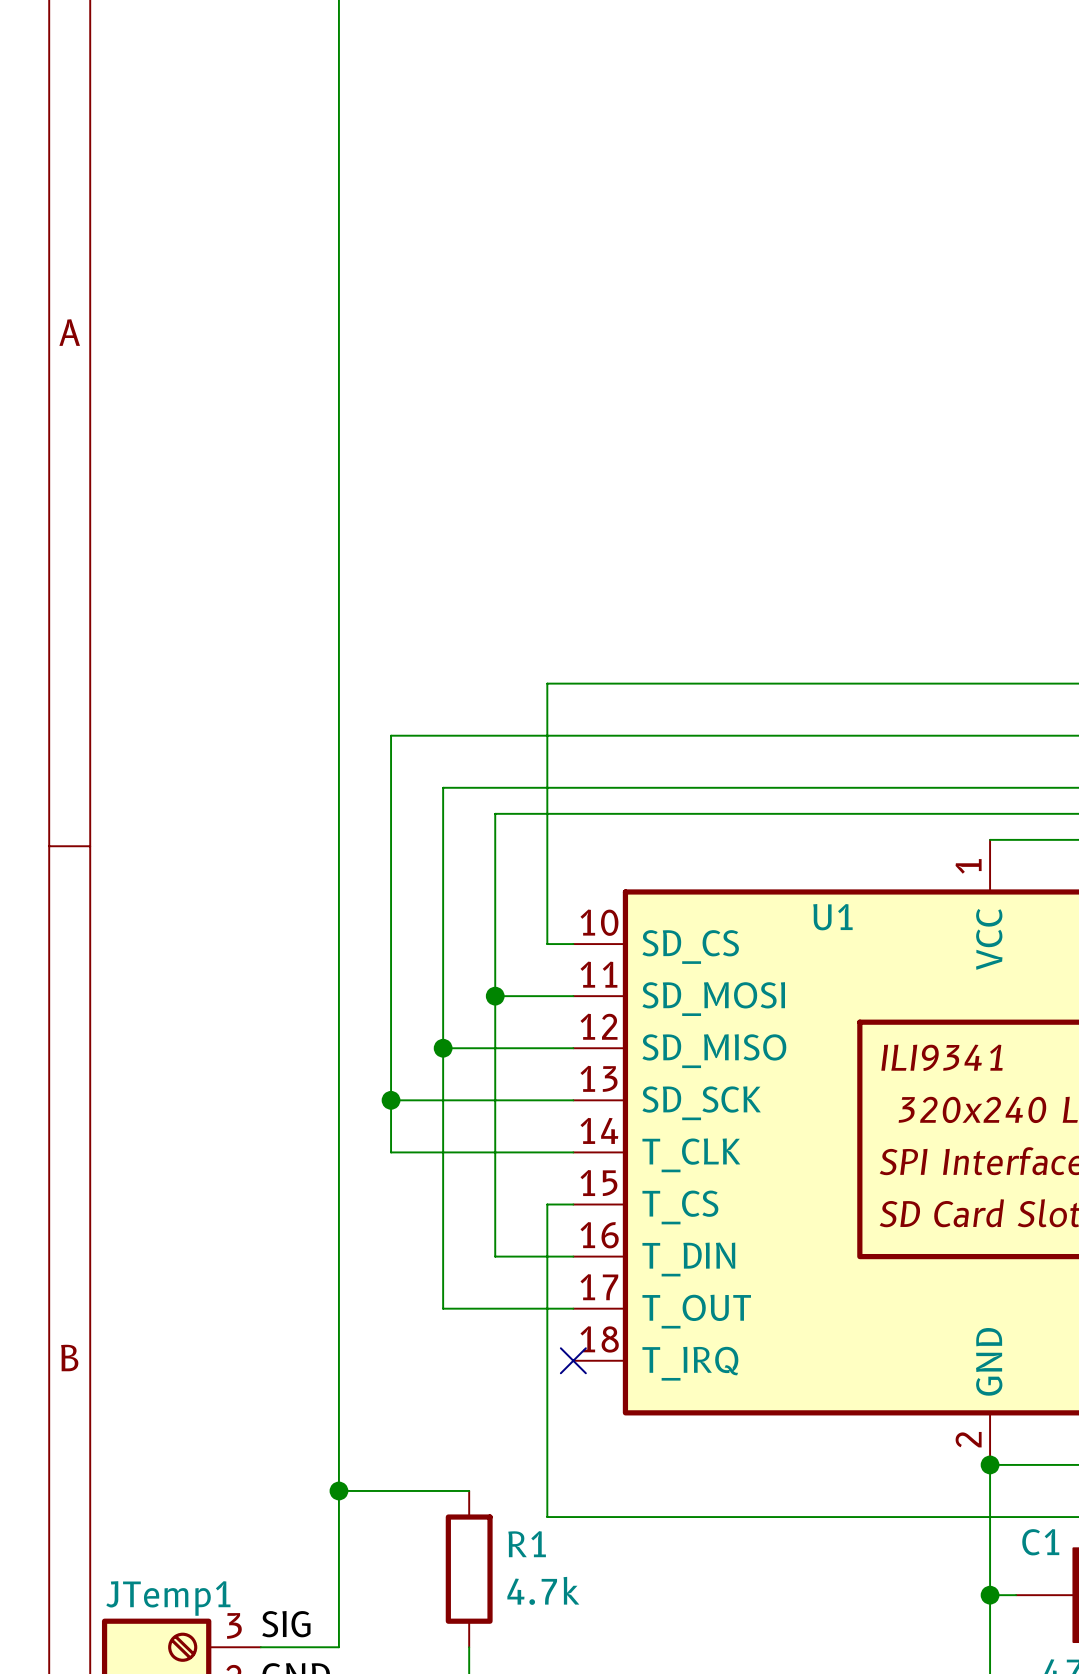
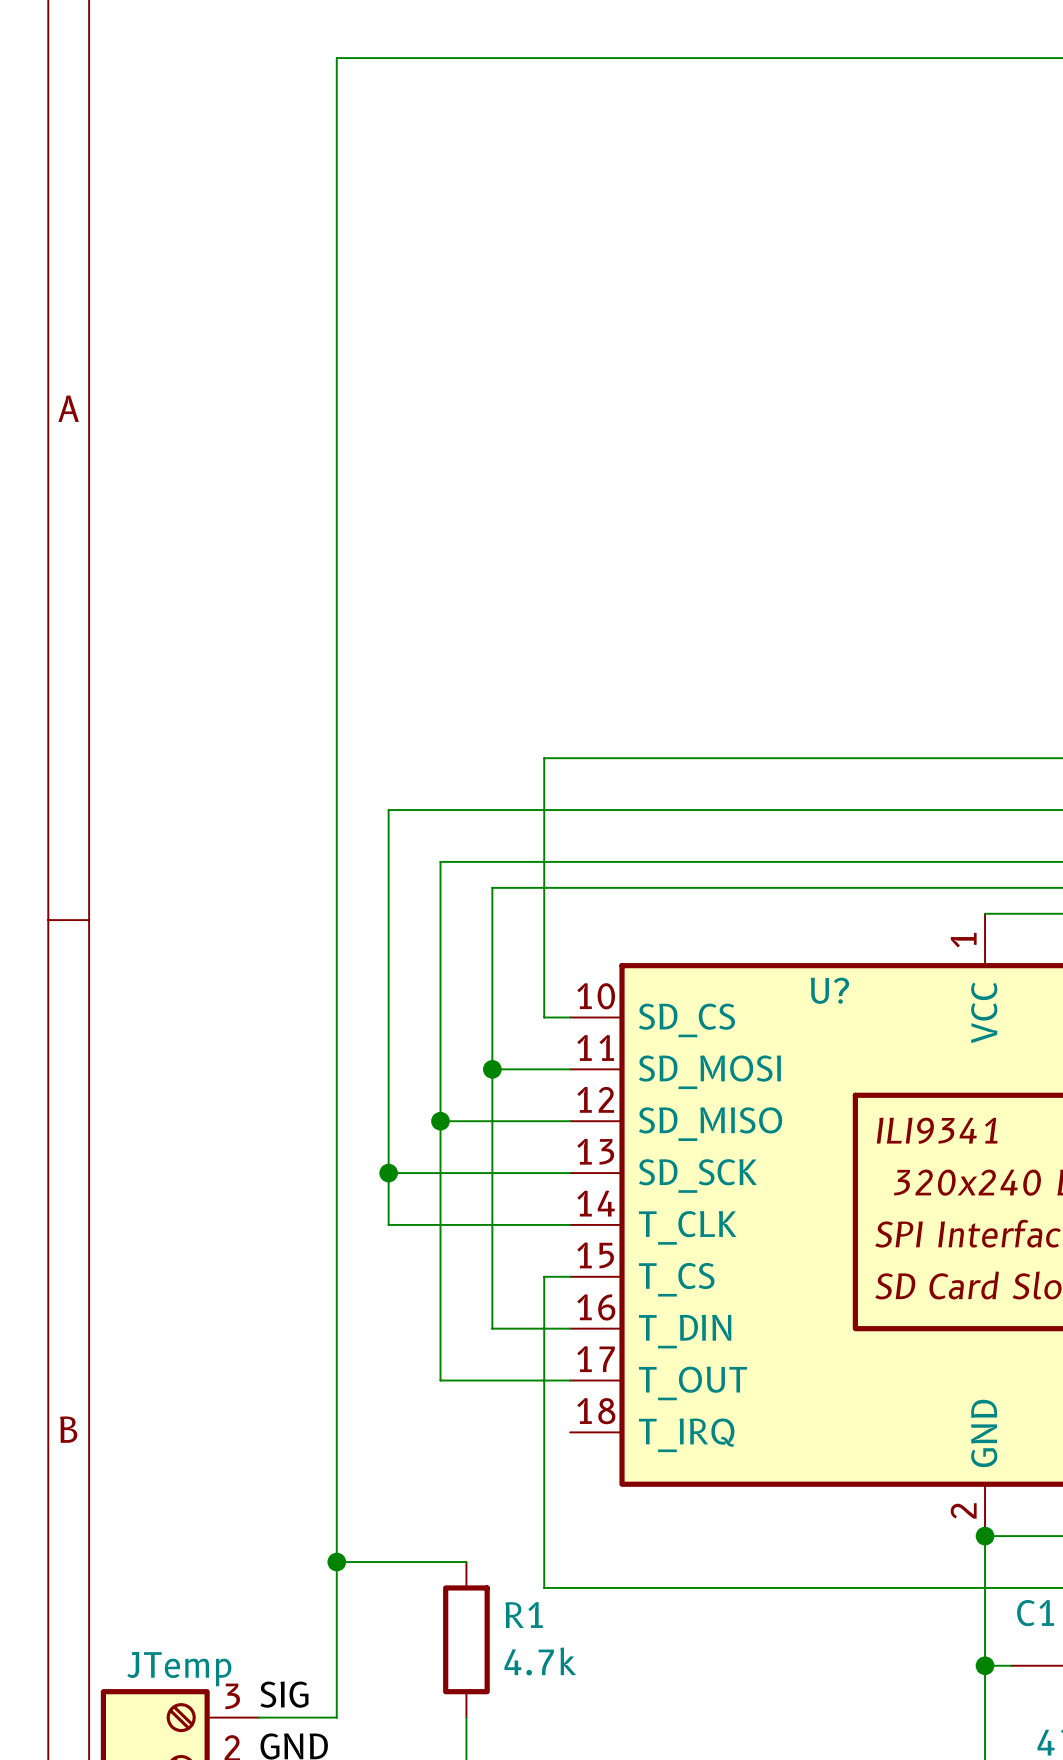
U1 name: U1 (832, 917) -> U? (829, 990)
no-connect mark: (573, 1360) -> none
JTemp1 name: JTemp1 (168, 1598) -> JTemp (179, 1669)

